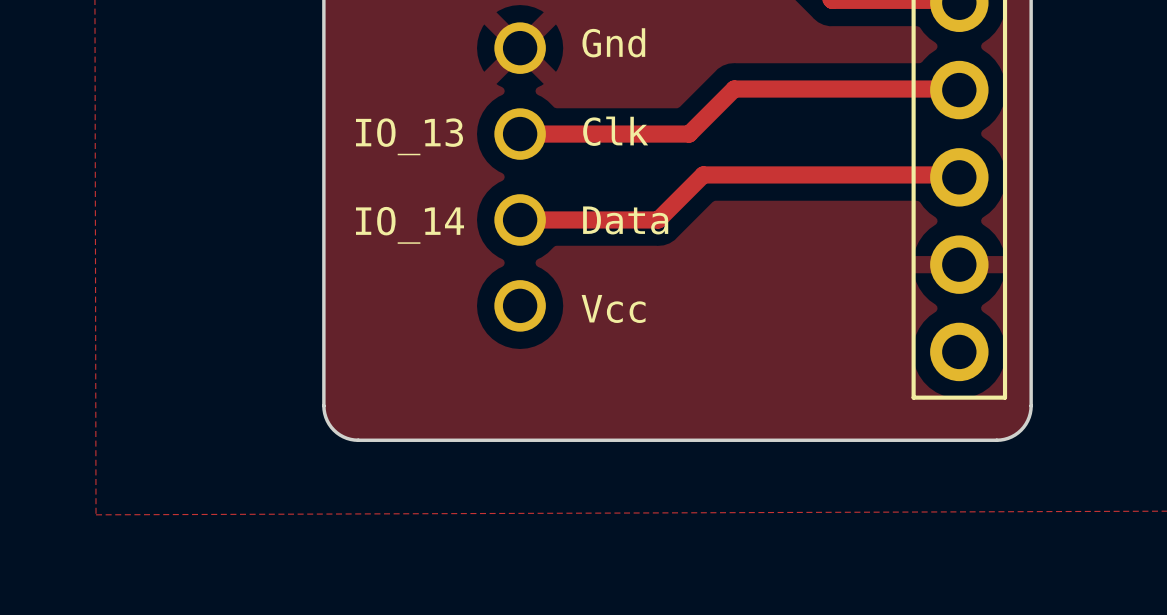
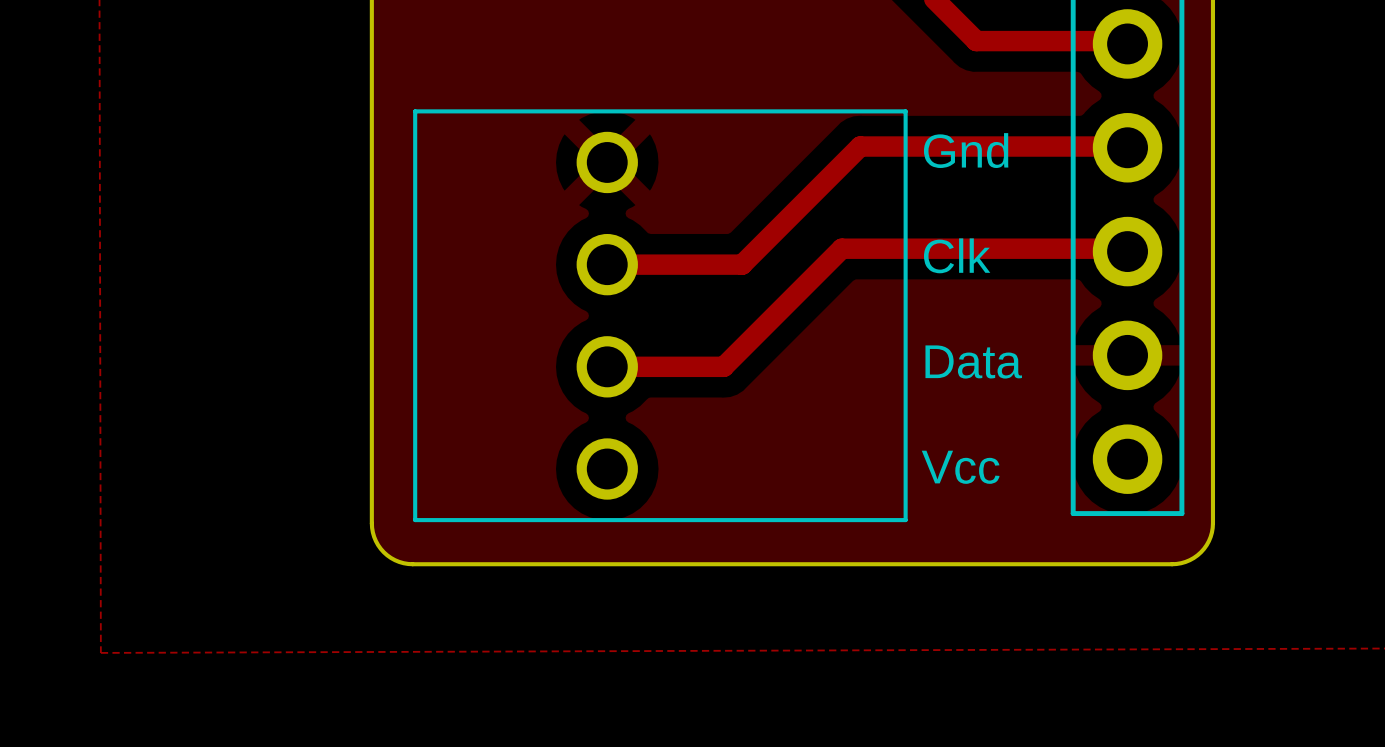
text position: Gnd (613, 42) -> Gnd (966, 150)
track: (734, 89) (689, 134) (520, 134) -> (860, 146) (742, 264) (607, 264)
text position: Clk (615, 131) -> Clk (957, 255)
text: IO_13 (409, 136) -> none
track: (719, 174) (703, 174) (658, 219) (520, 219) -> (841, 248) (723, 366) (607, 366)
part side: bottom (520, 177) -> top (660, 315)
text position: Data (625, 220) -> Data (973, 361)
text: IO_14 (410, 225) -> none
text position: Vcc (613, 308) -> Vcc (960, 467)

